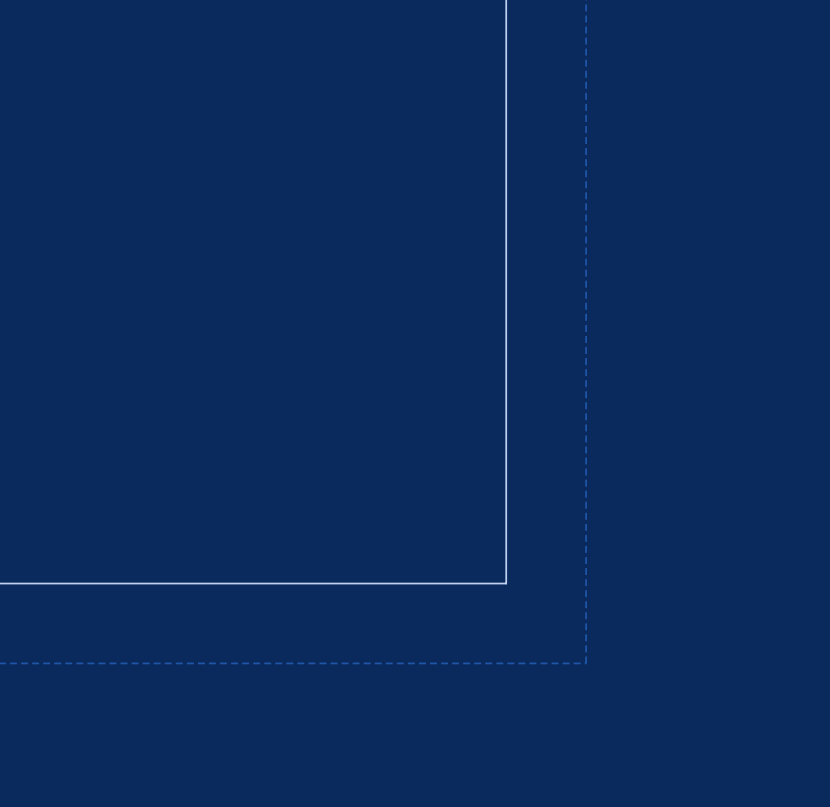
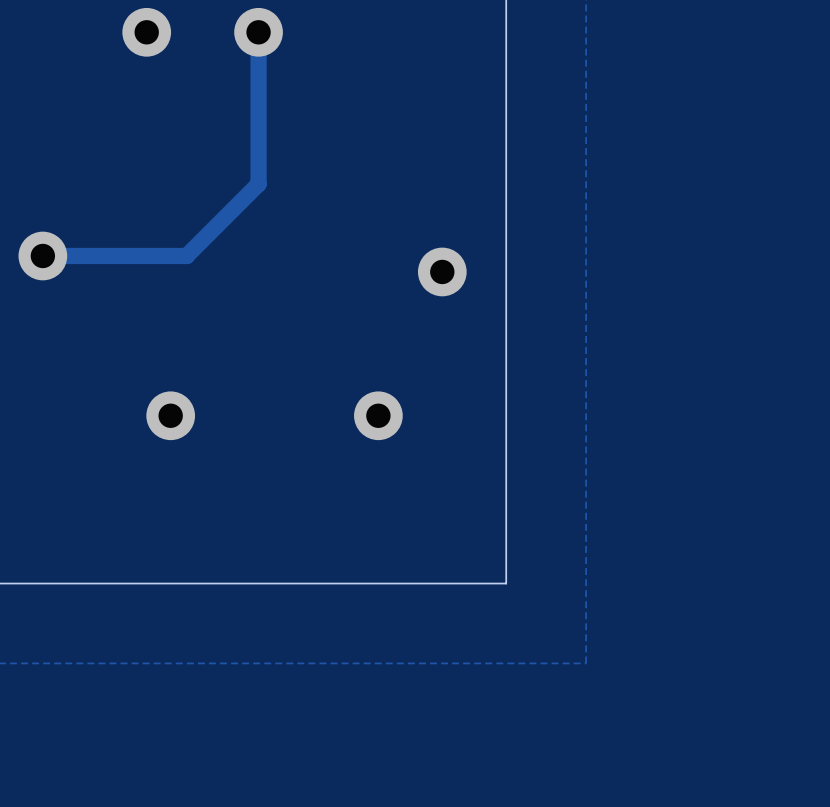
via: none -> (146, 32)
track: none -> (258, 32) (258, 184) (186, 255) (42, 255)
via: none -> (258, 32)
via: none -> (42, 255)
via: none -> (442, 271)
via: none -> (170, 415)
via: none -> (378, 415)

